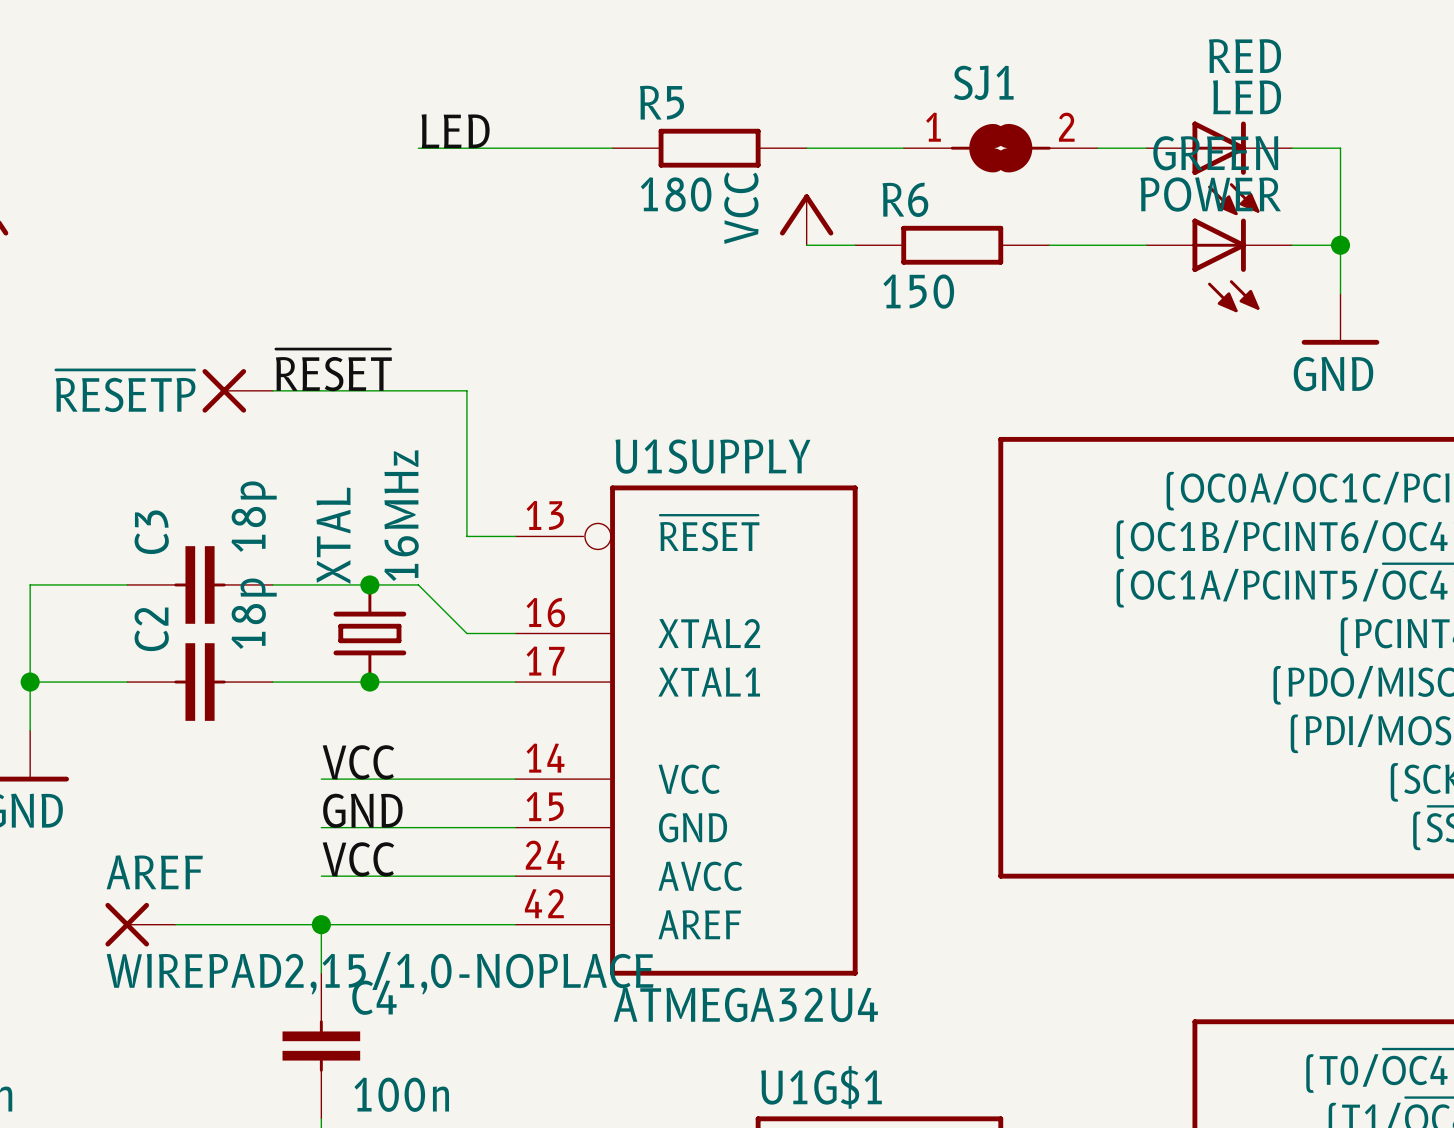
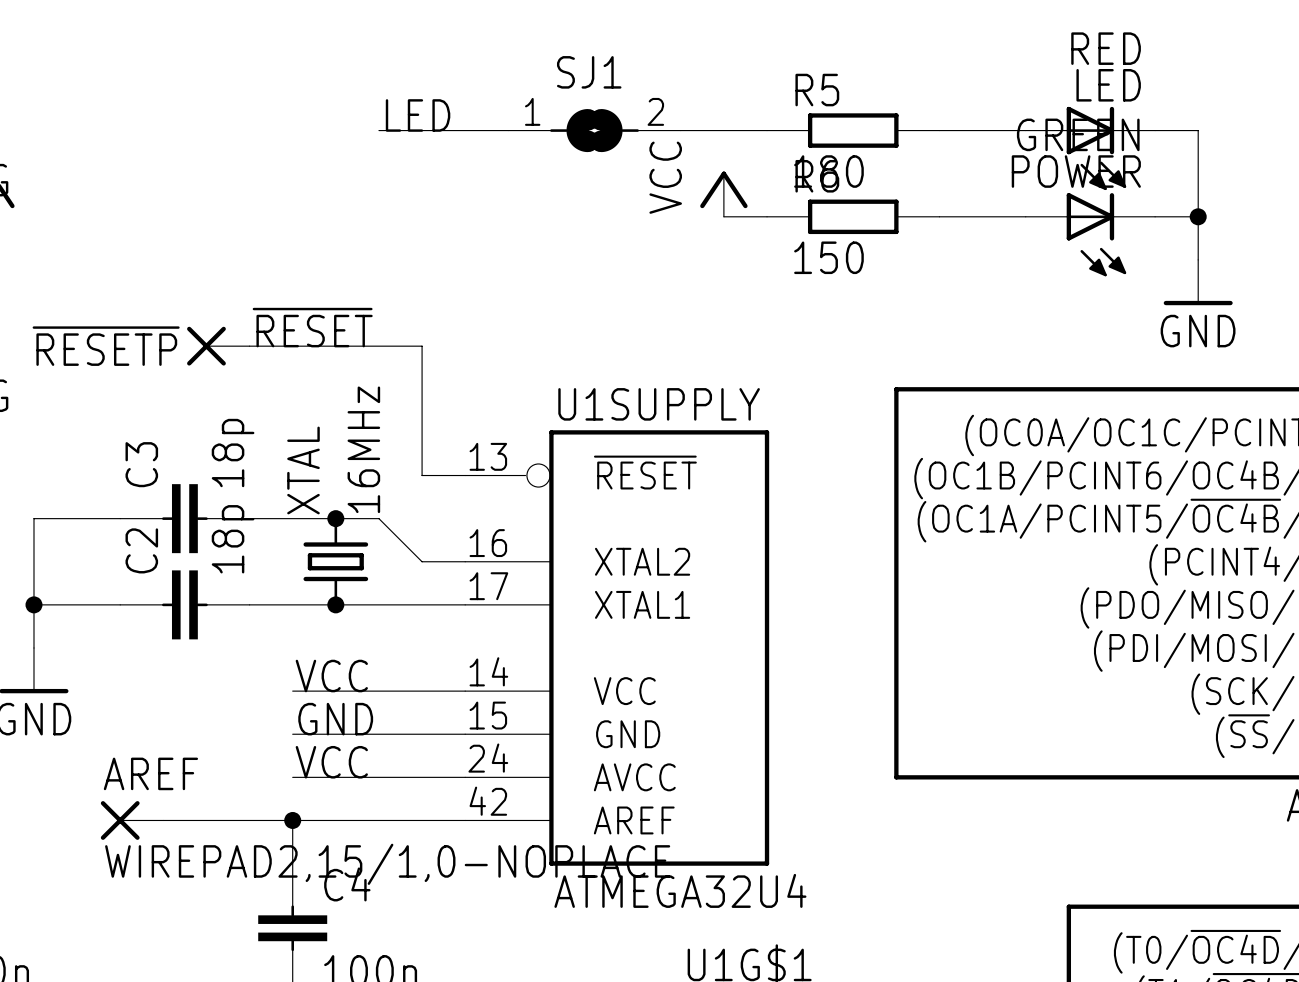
R5 position: (709, 148) -> (853, 130)
SJ1 position: (1000, 148) -> (594, 130)

